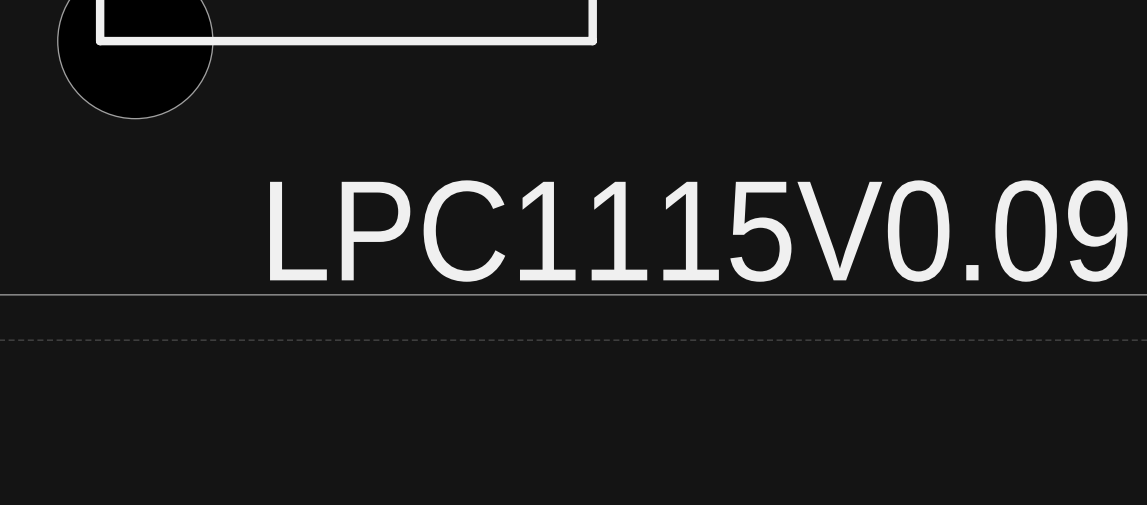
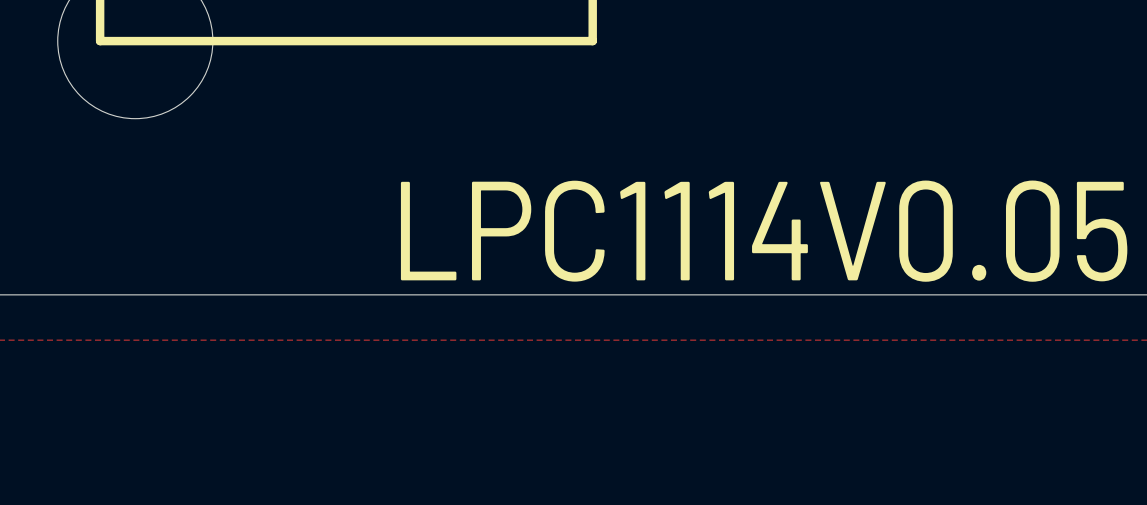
text: LPC1115V0.09 (698, 231) -> LPC1114V0.05 (764, 231)

